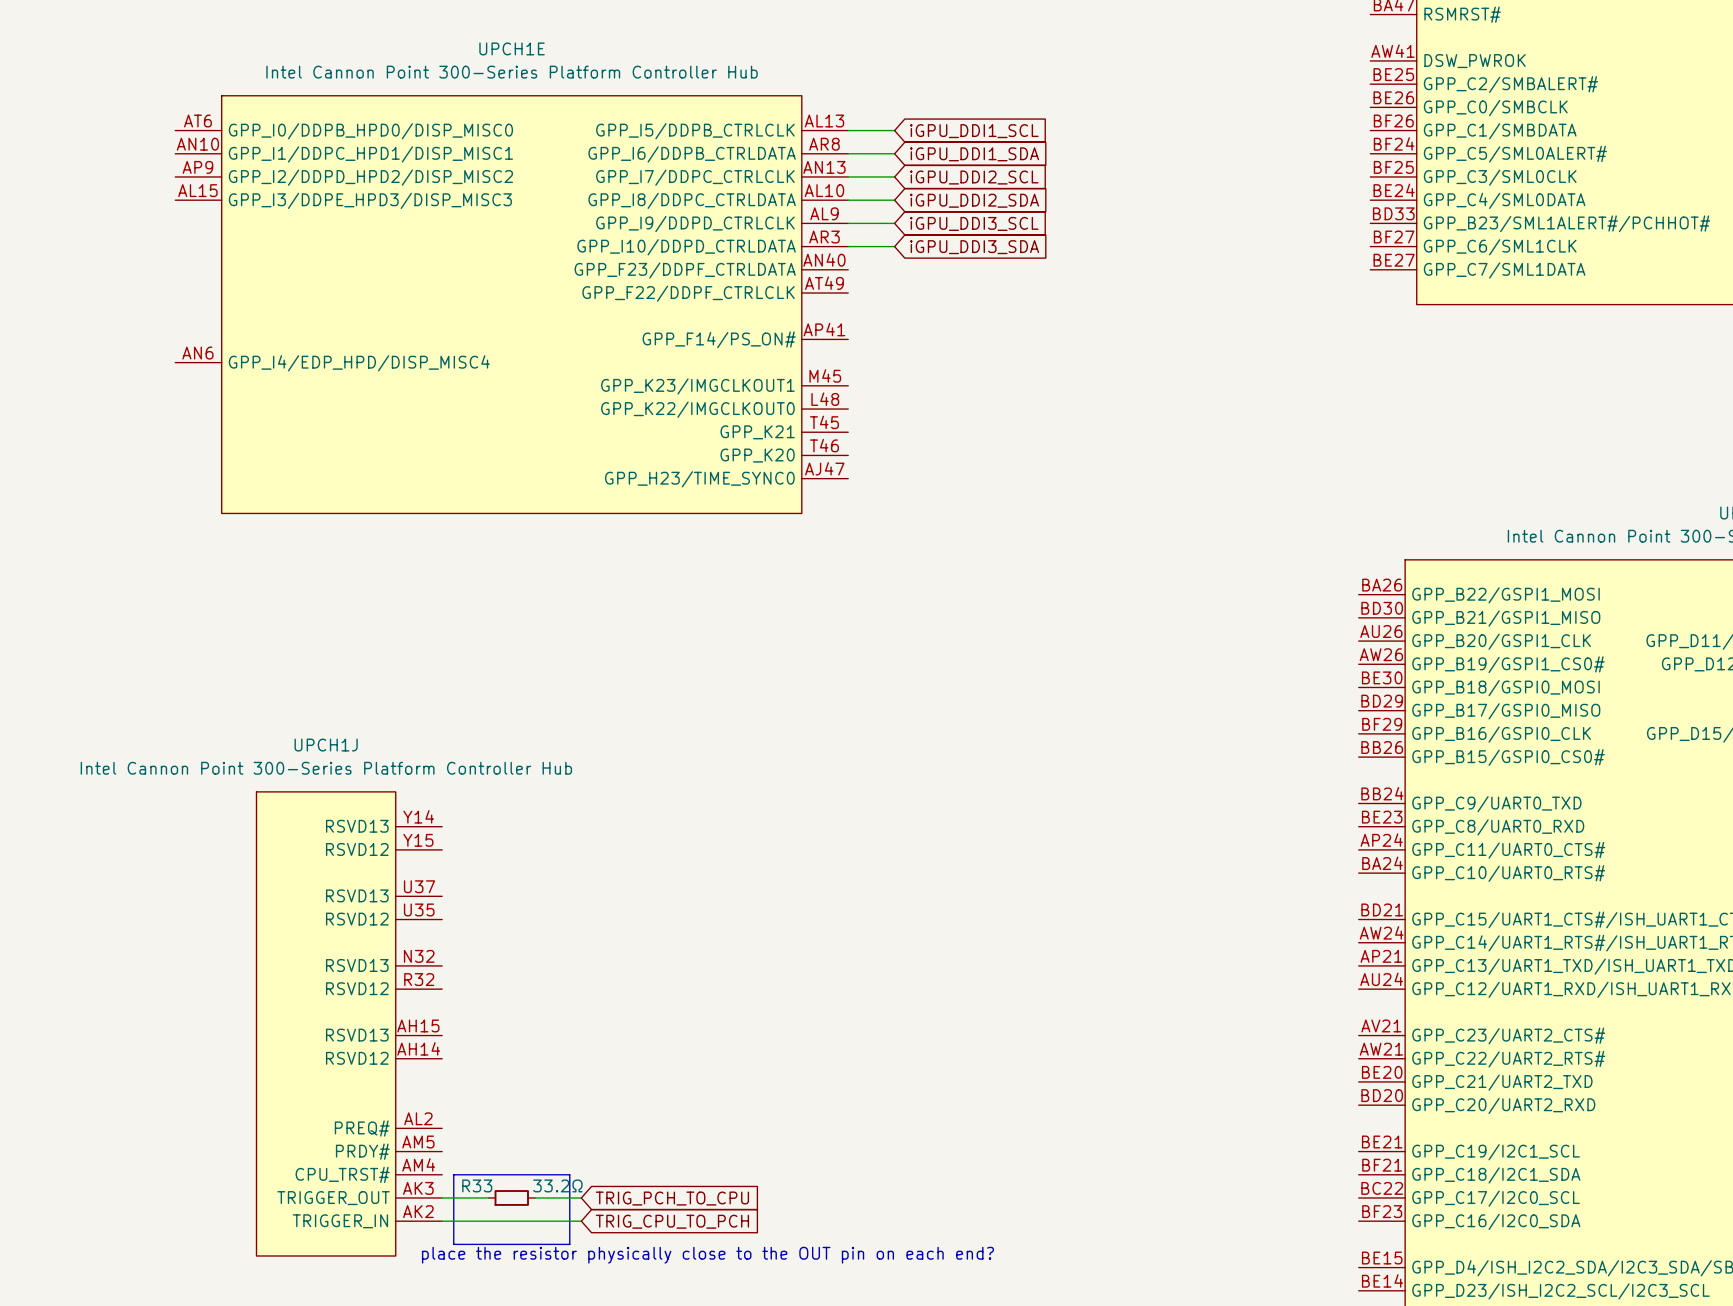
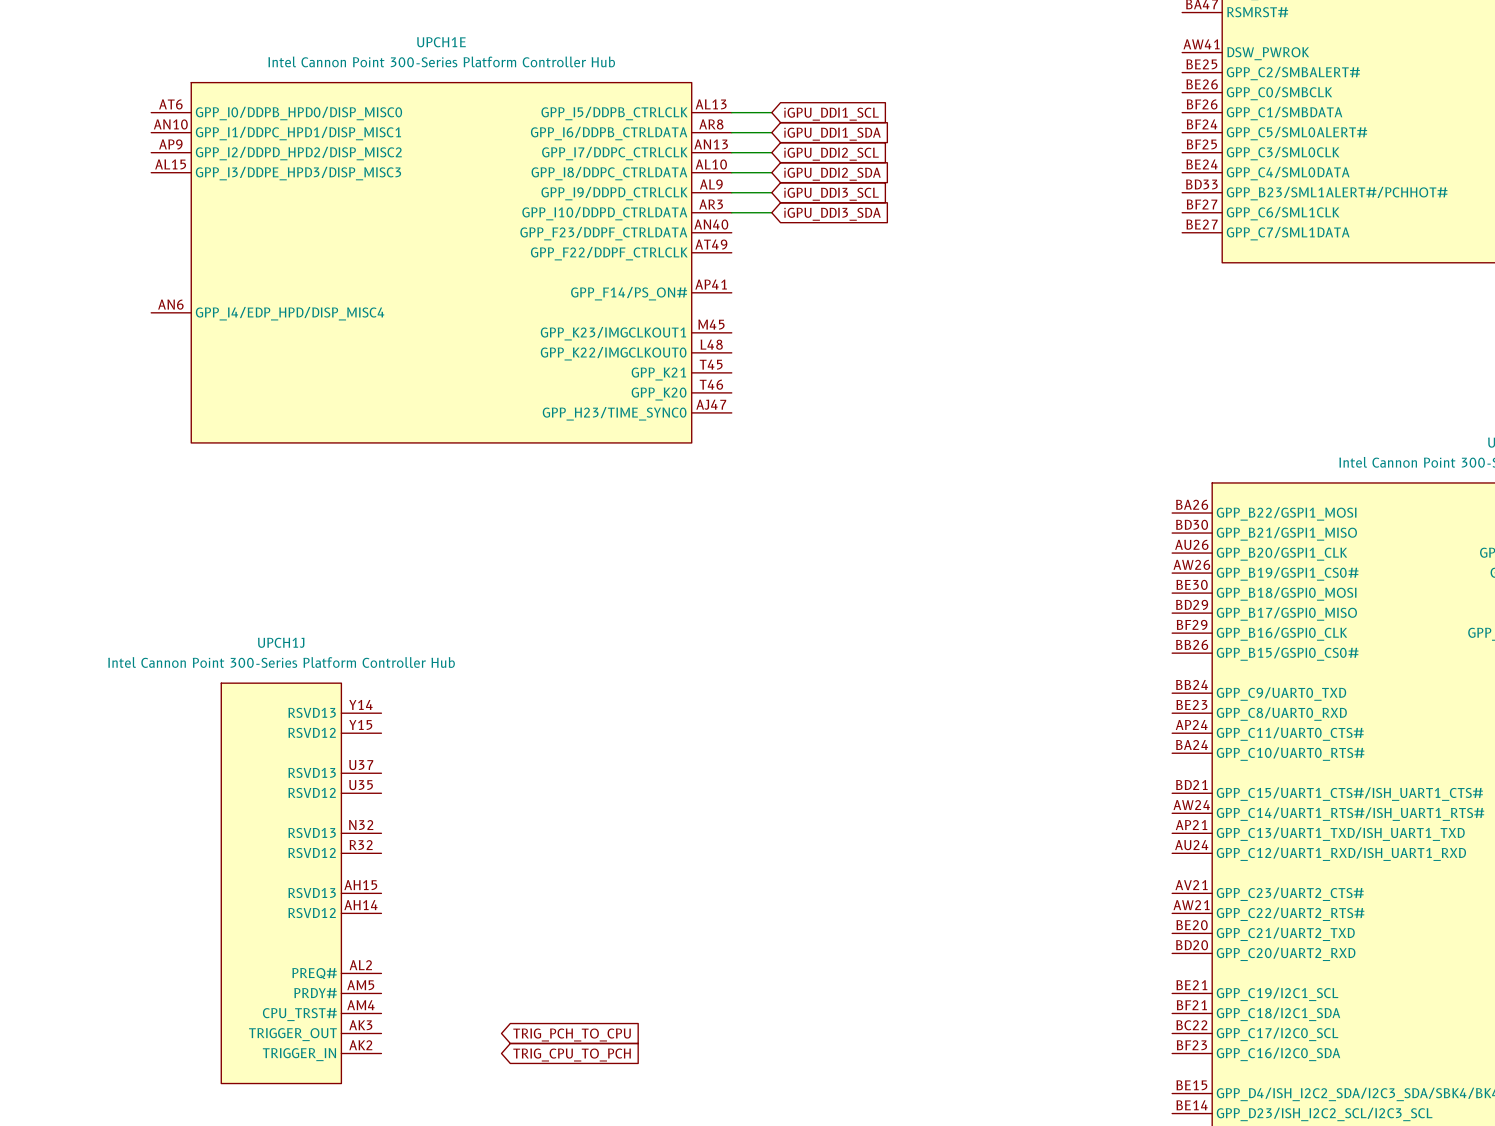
line: (453, 1174) (569, 1174) (569, 1244) (453, 1244) (453, 1174) -> none
wire: (442, 1197) (488, 1197) -> none
R33: 33.2Ω (511, 1197) -> none
wire: (534, 1197) (581, 1197) -> none
wire: (442, 1221) (581, 1221) -> none
text: place the resistor physically close to the OUT pin on each end? (707, 1255) -> none

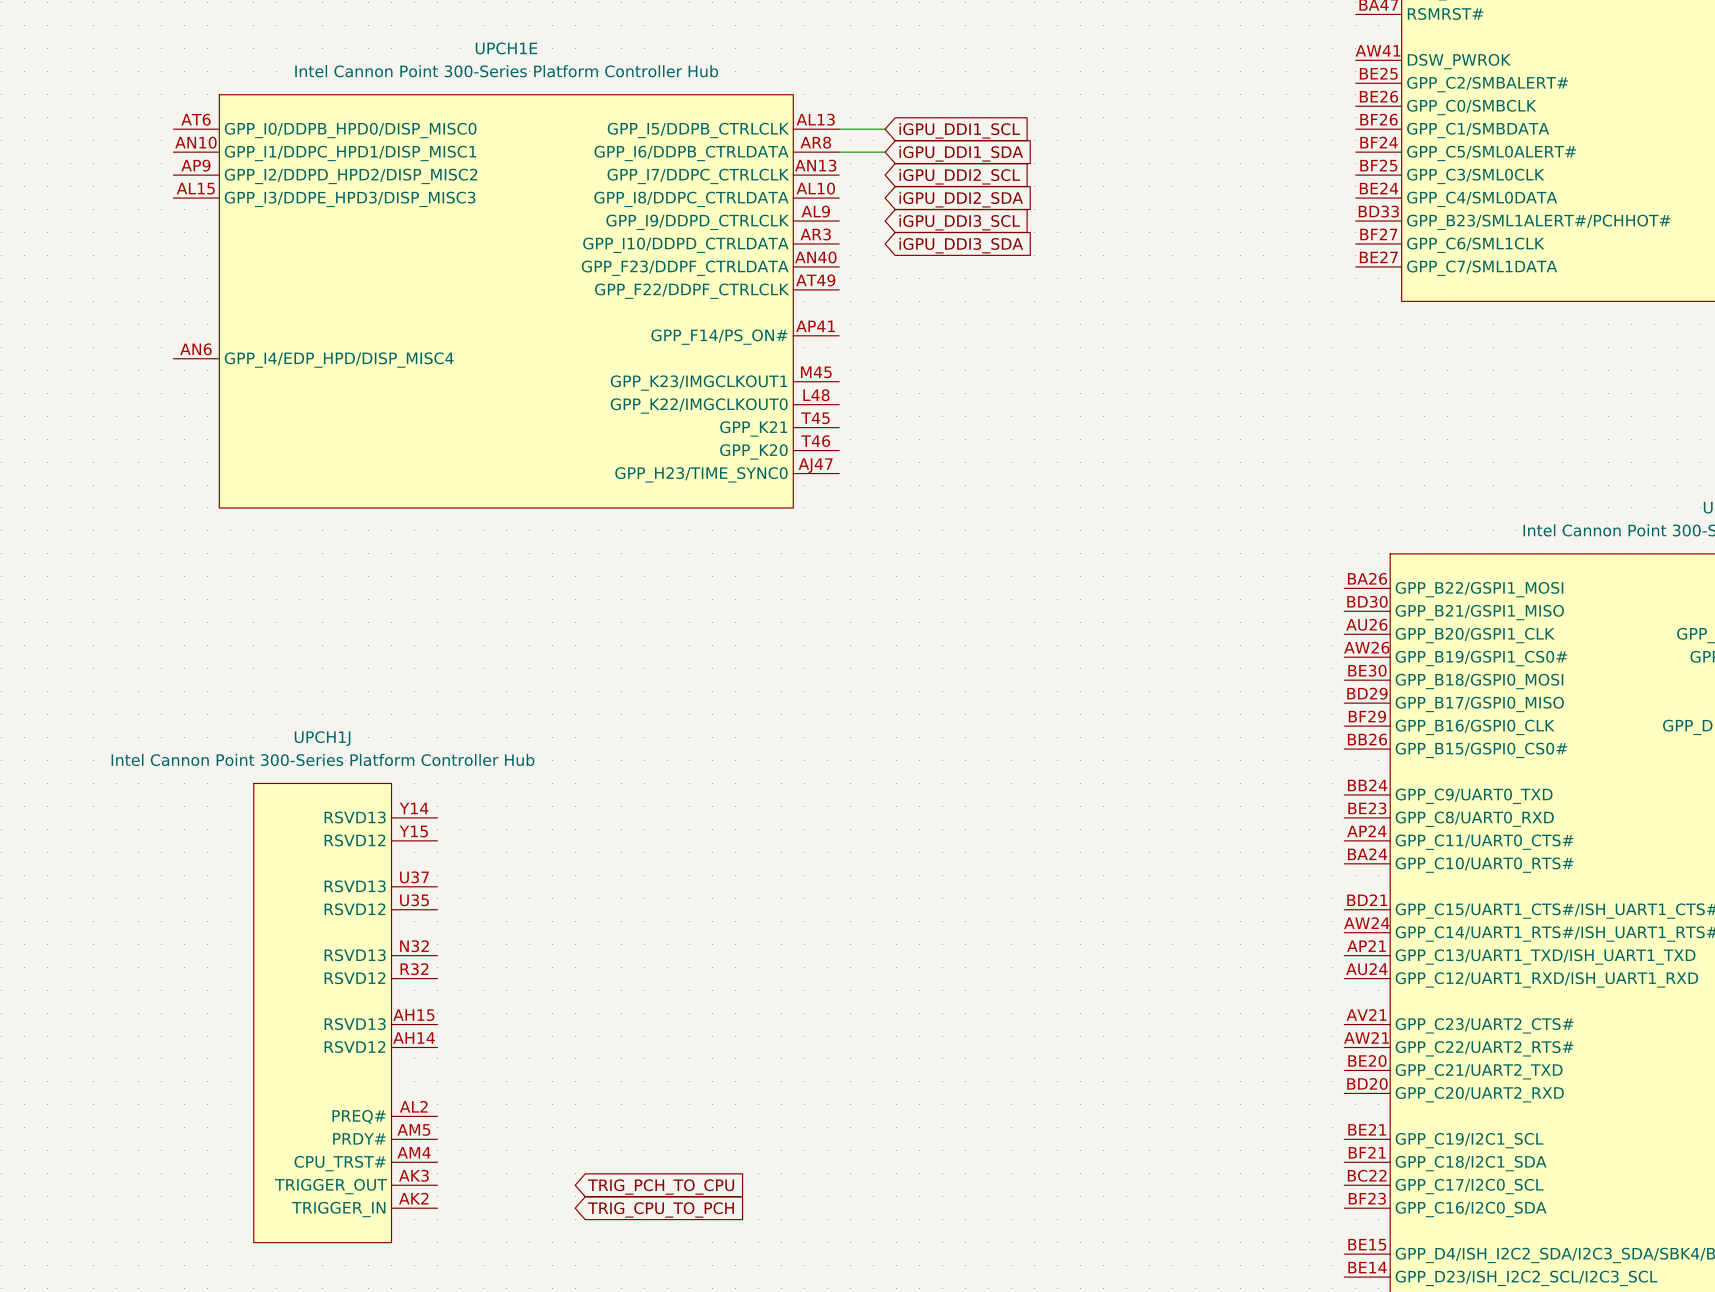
wire: (731, 152) (771, 152) -> none
wire: (731, 172) (771, 172) -> none
wire: (731, 192) (771, 192) -> none
wire: (731, 212) (771, 212) -> none

